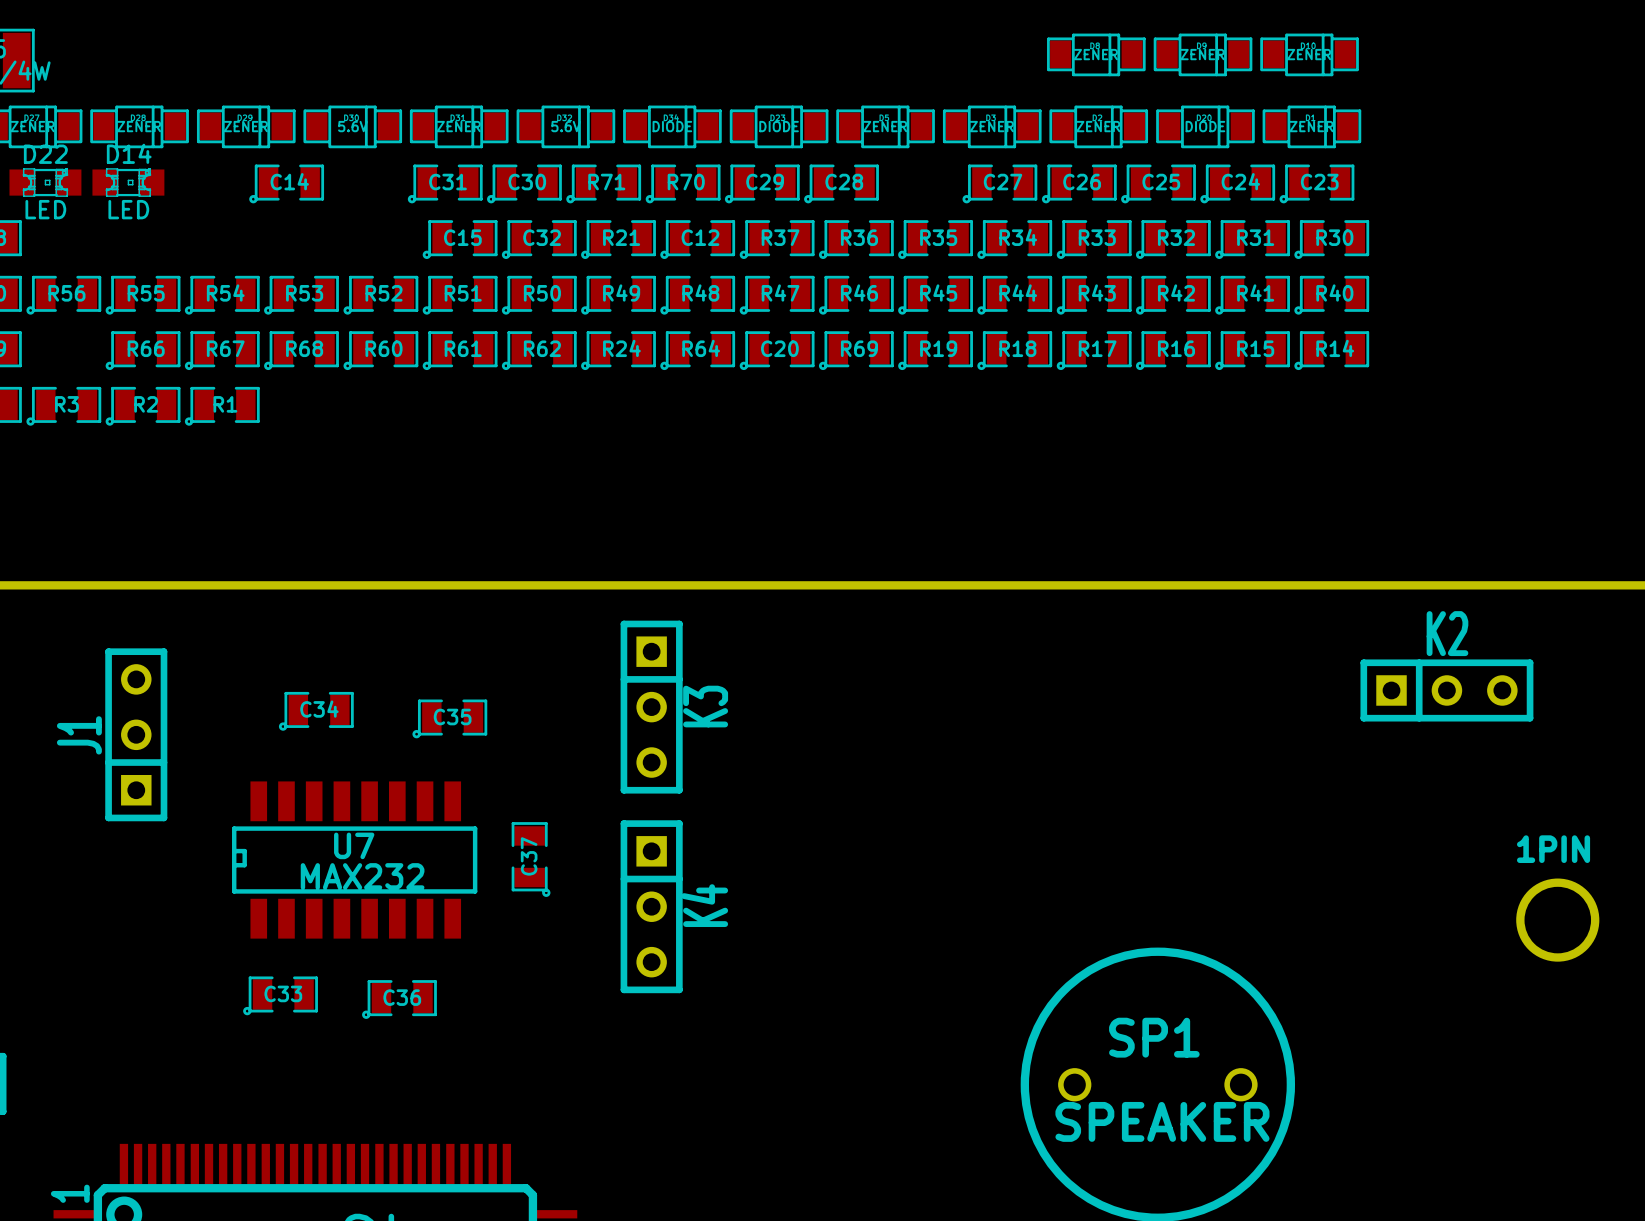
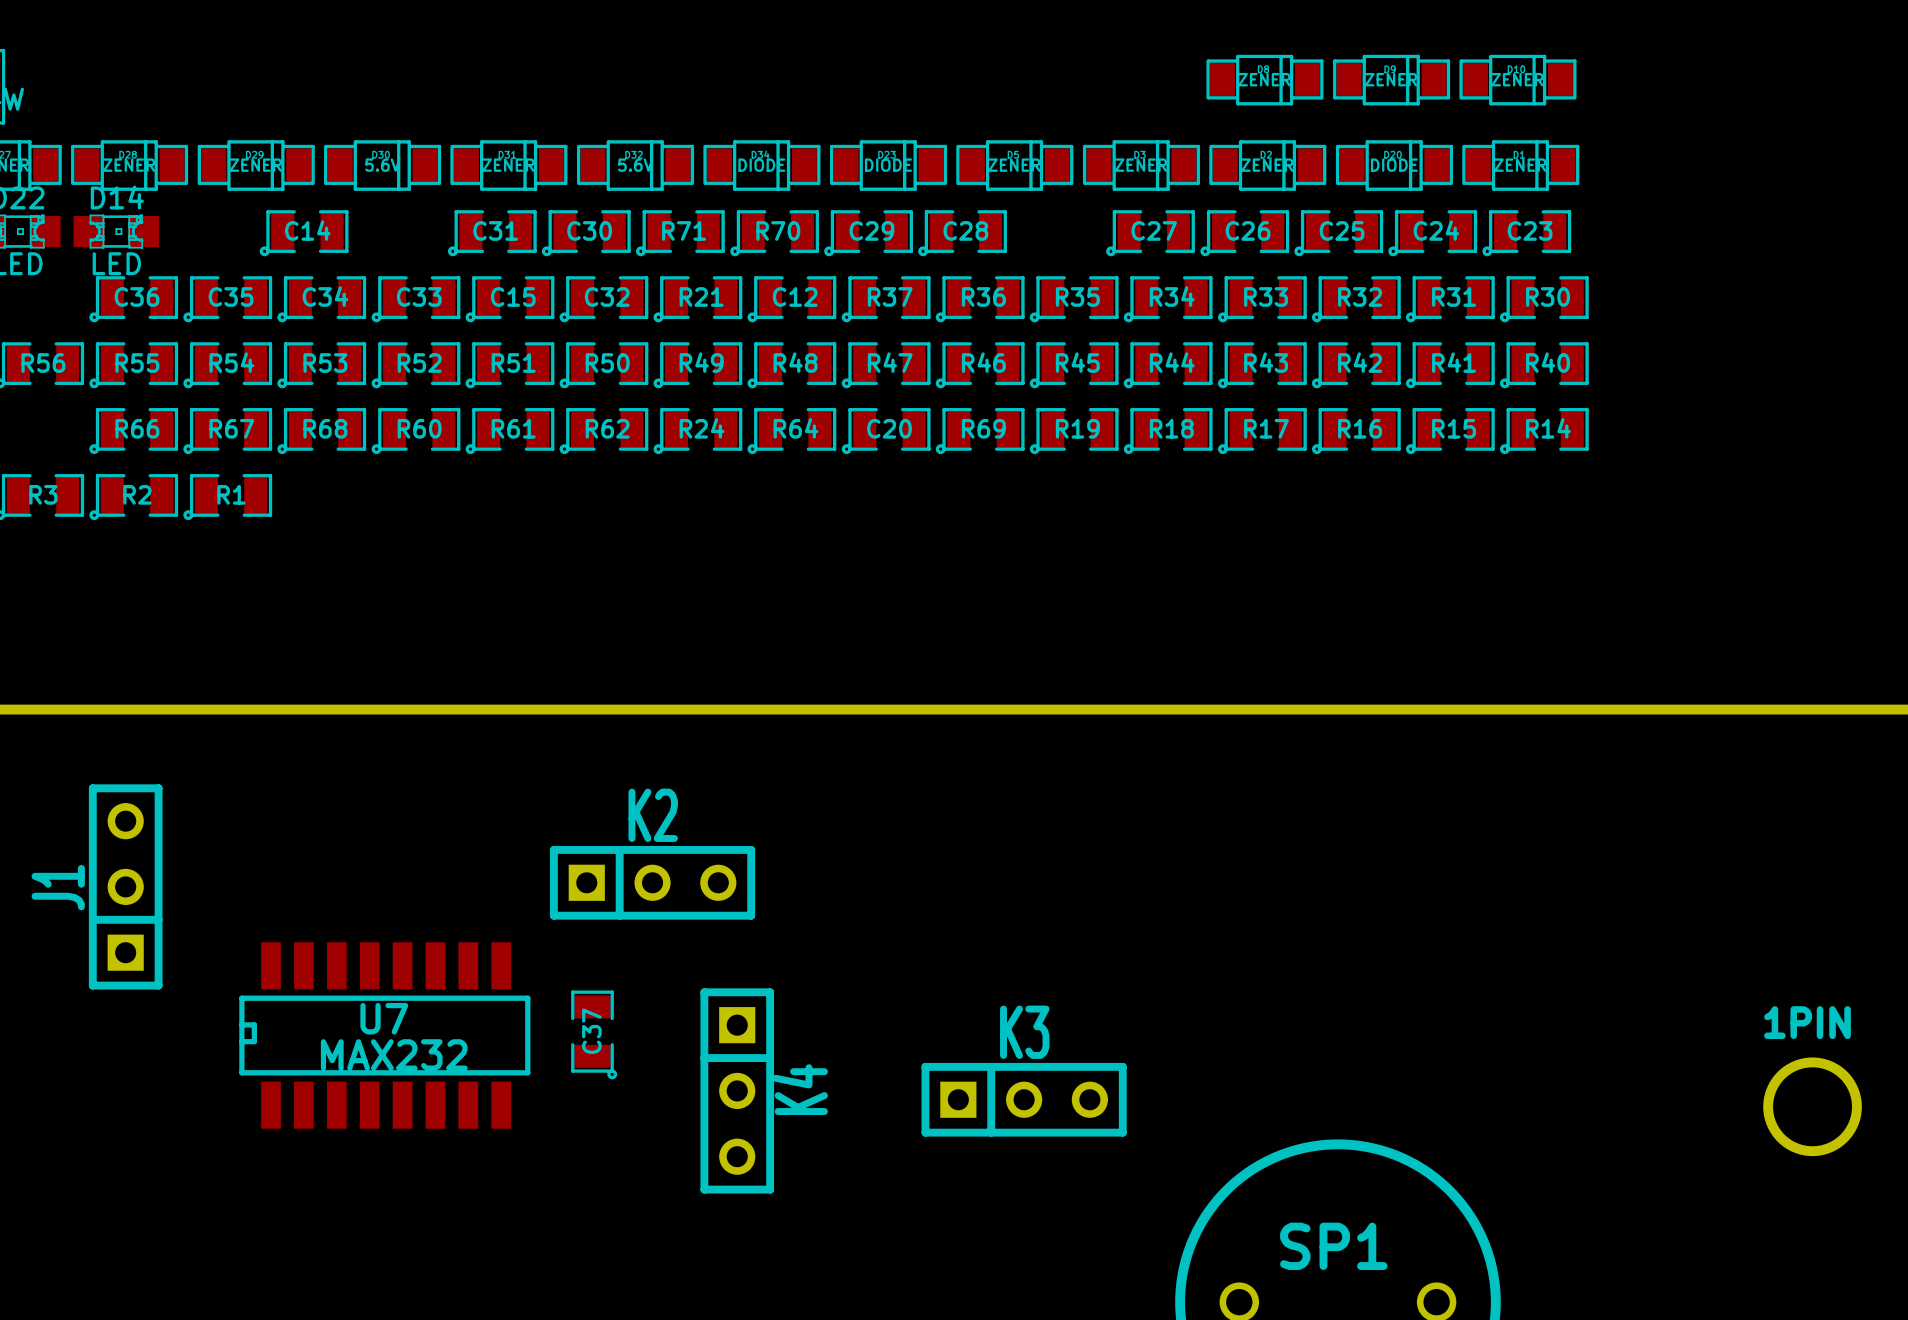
K2 position: (1446, 690) -> (652, 882)
K3 rotation: 0° (651, 707) -> 90° counterclockwise (1024, 1099)
K3 position: (651, 707) -> (1024, 1099)
C34 position: (316, 711) -> (321, 299)
C35 position: (449, 718) -> (227, 299)
C33 position: (280, 995) -> (415, 299)
C36 position: (399, 999) -> (133, 299)

